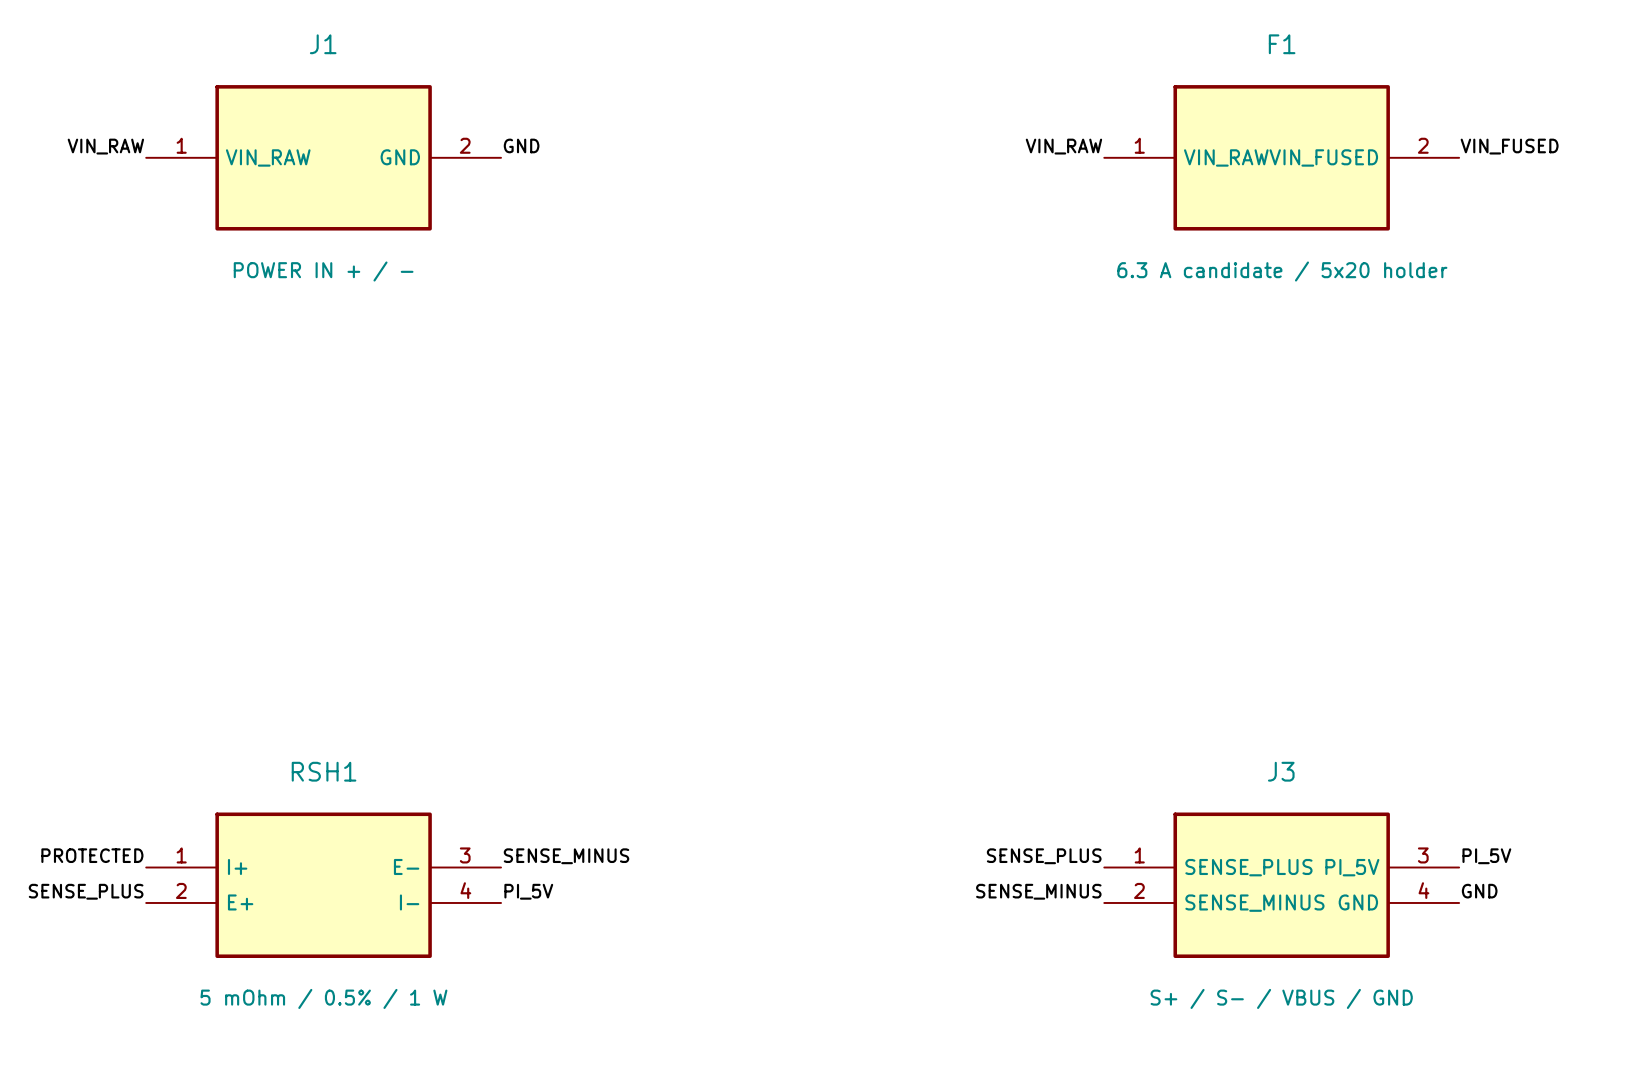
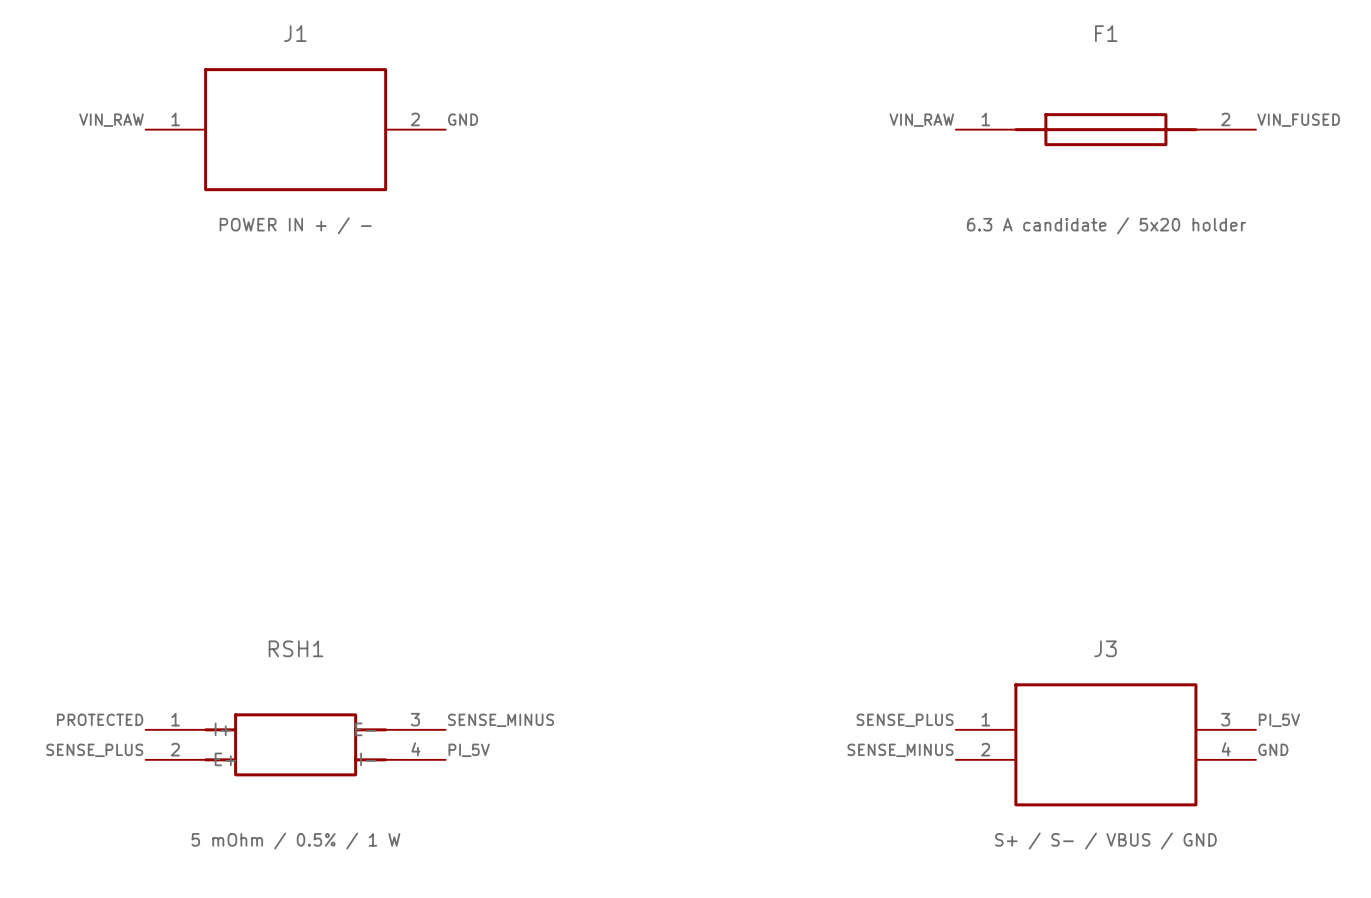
F1 symbol: [1104, 85, 1460, 231] -> [955, 113, 1256, 147]
J1 pin name: VIN_RAW (268, 157) -> none
J1 pin name: GND (400, 157) -> none
RSH1 symbol: [146, 812, 502, 958] -> [145, 713, 446, 777]
J3 pin name: SENSE_PLUS (1248, 867) -> none
J3 pin name: PI_5V (1352, 867) -> none
J3 pin name: GND (1358, 902) -> none
J3 pin name: SENSE_MINUS (1254, 903) -> none

